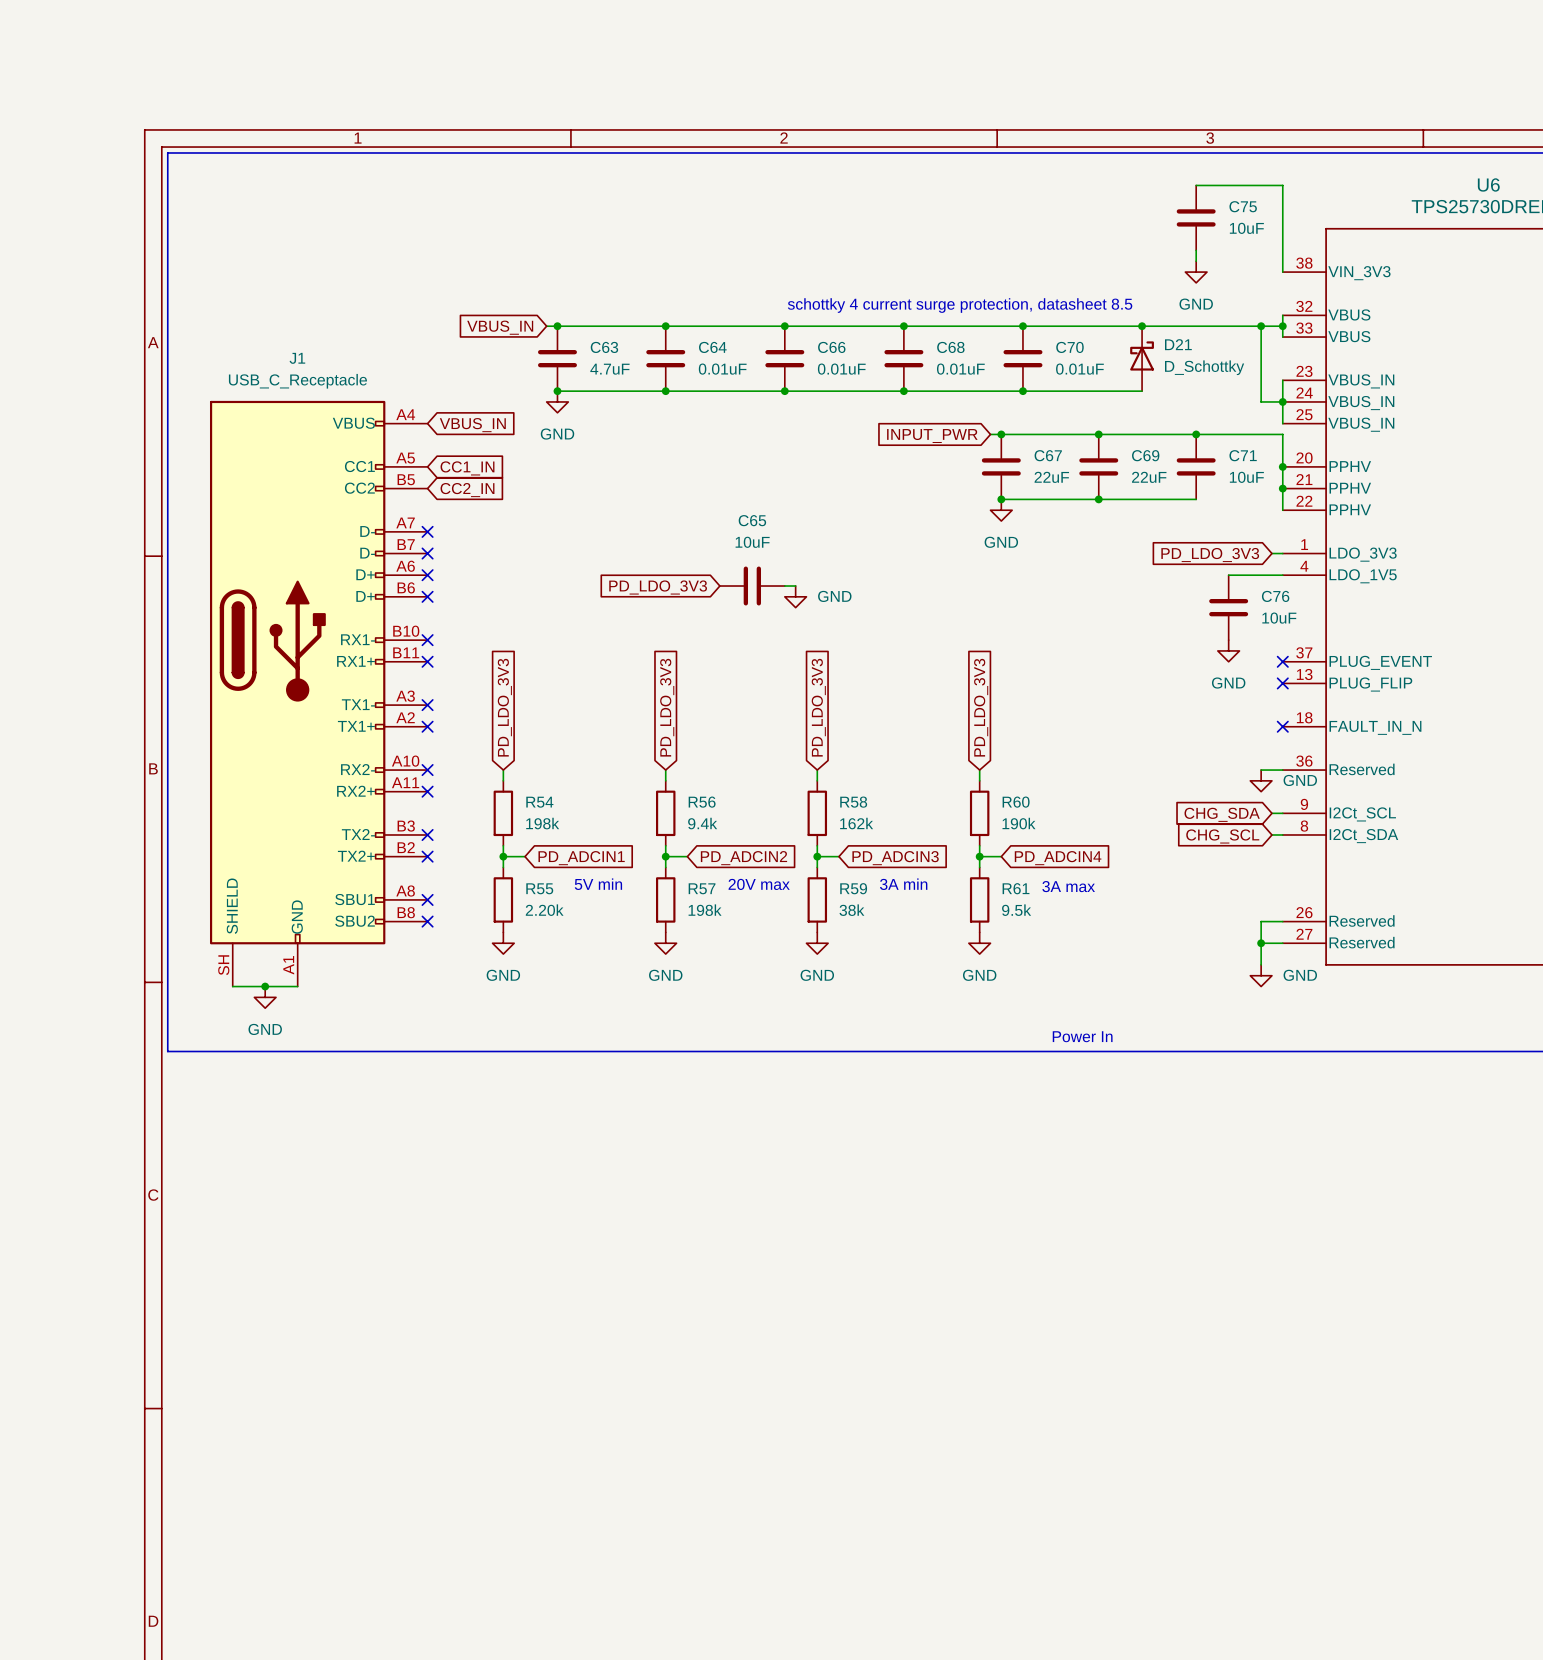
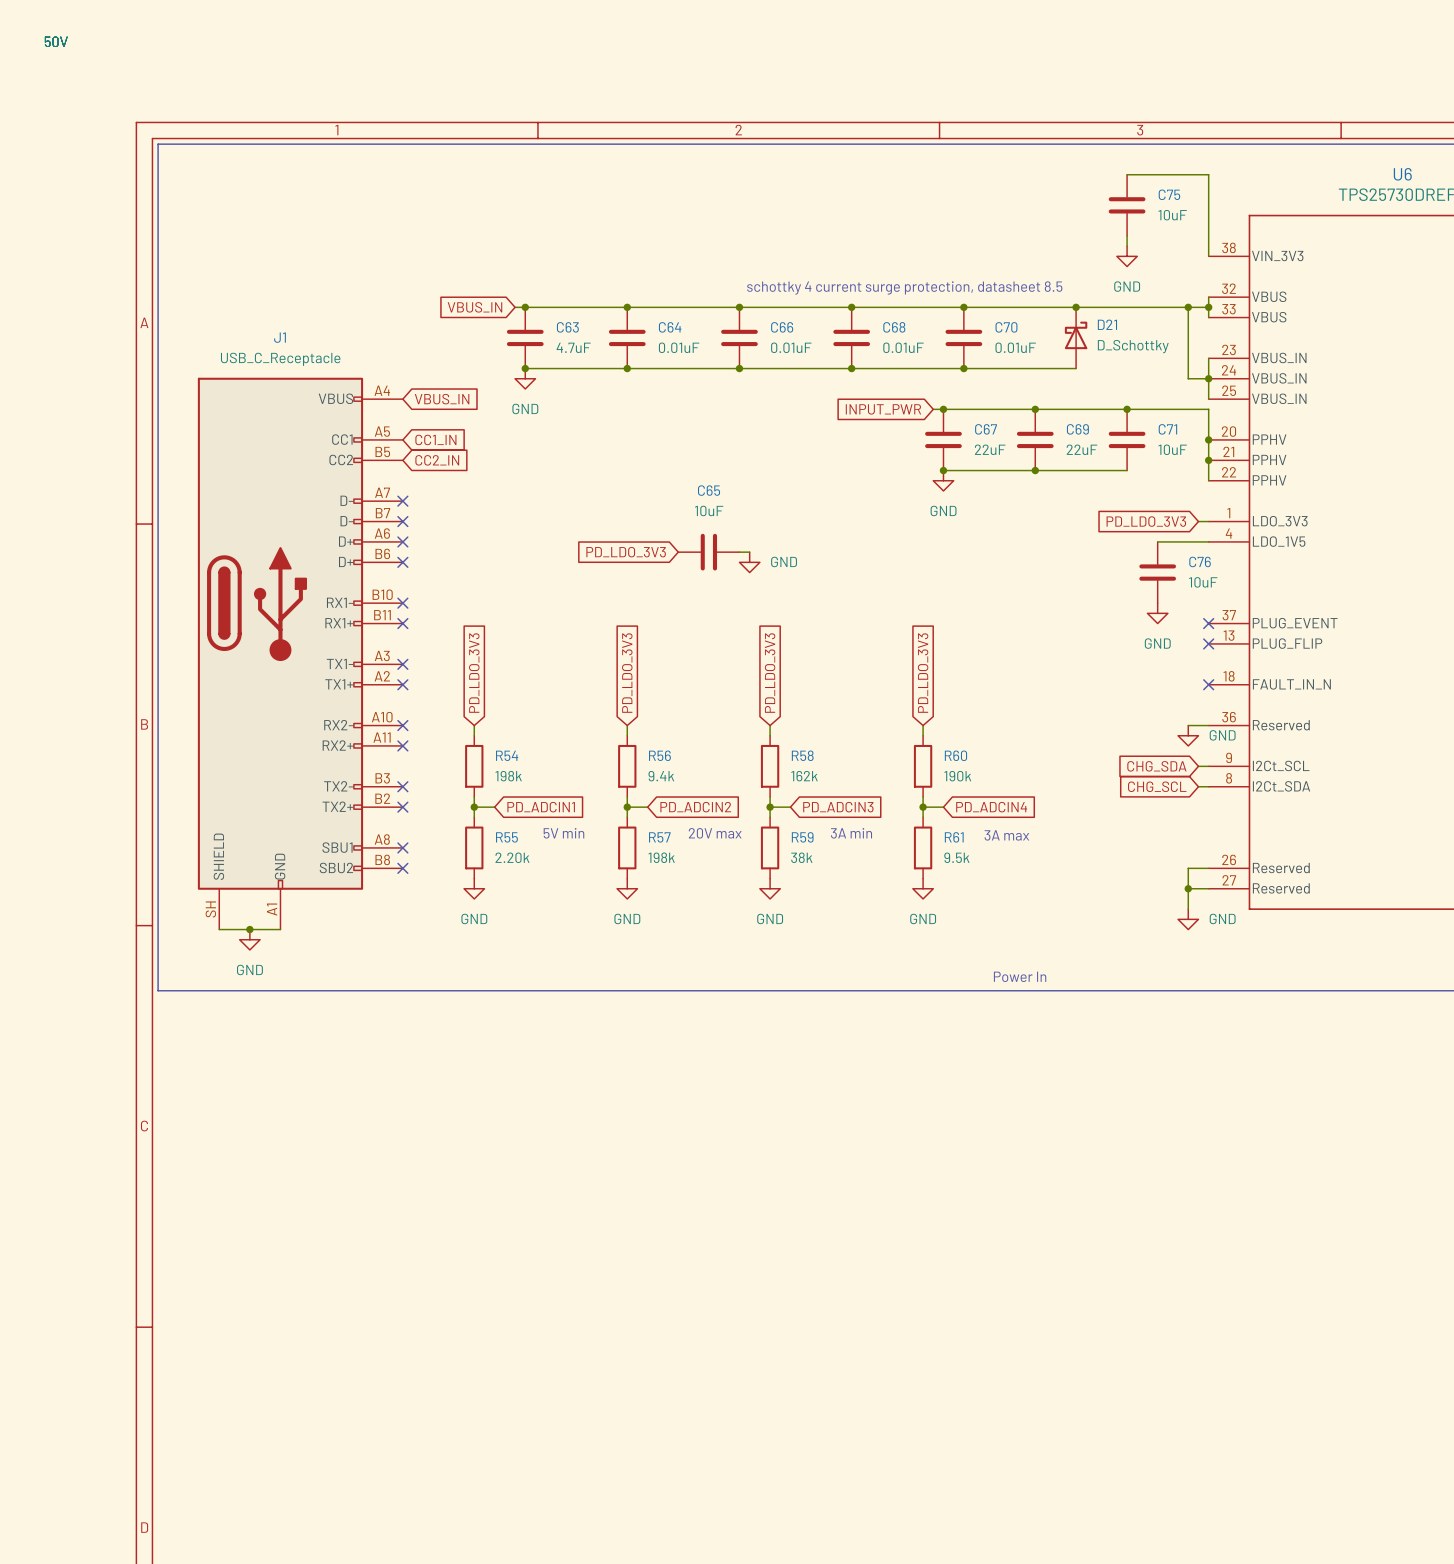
C68 text: none -> 50V (56, 41)
C64 text: none -> 50V (56, 41)
C66 text: none -> 50V (56, 41)

